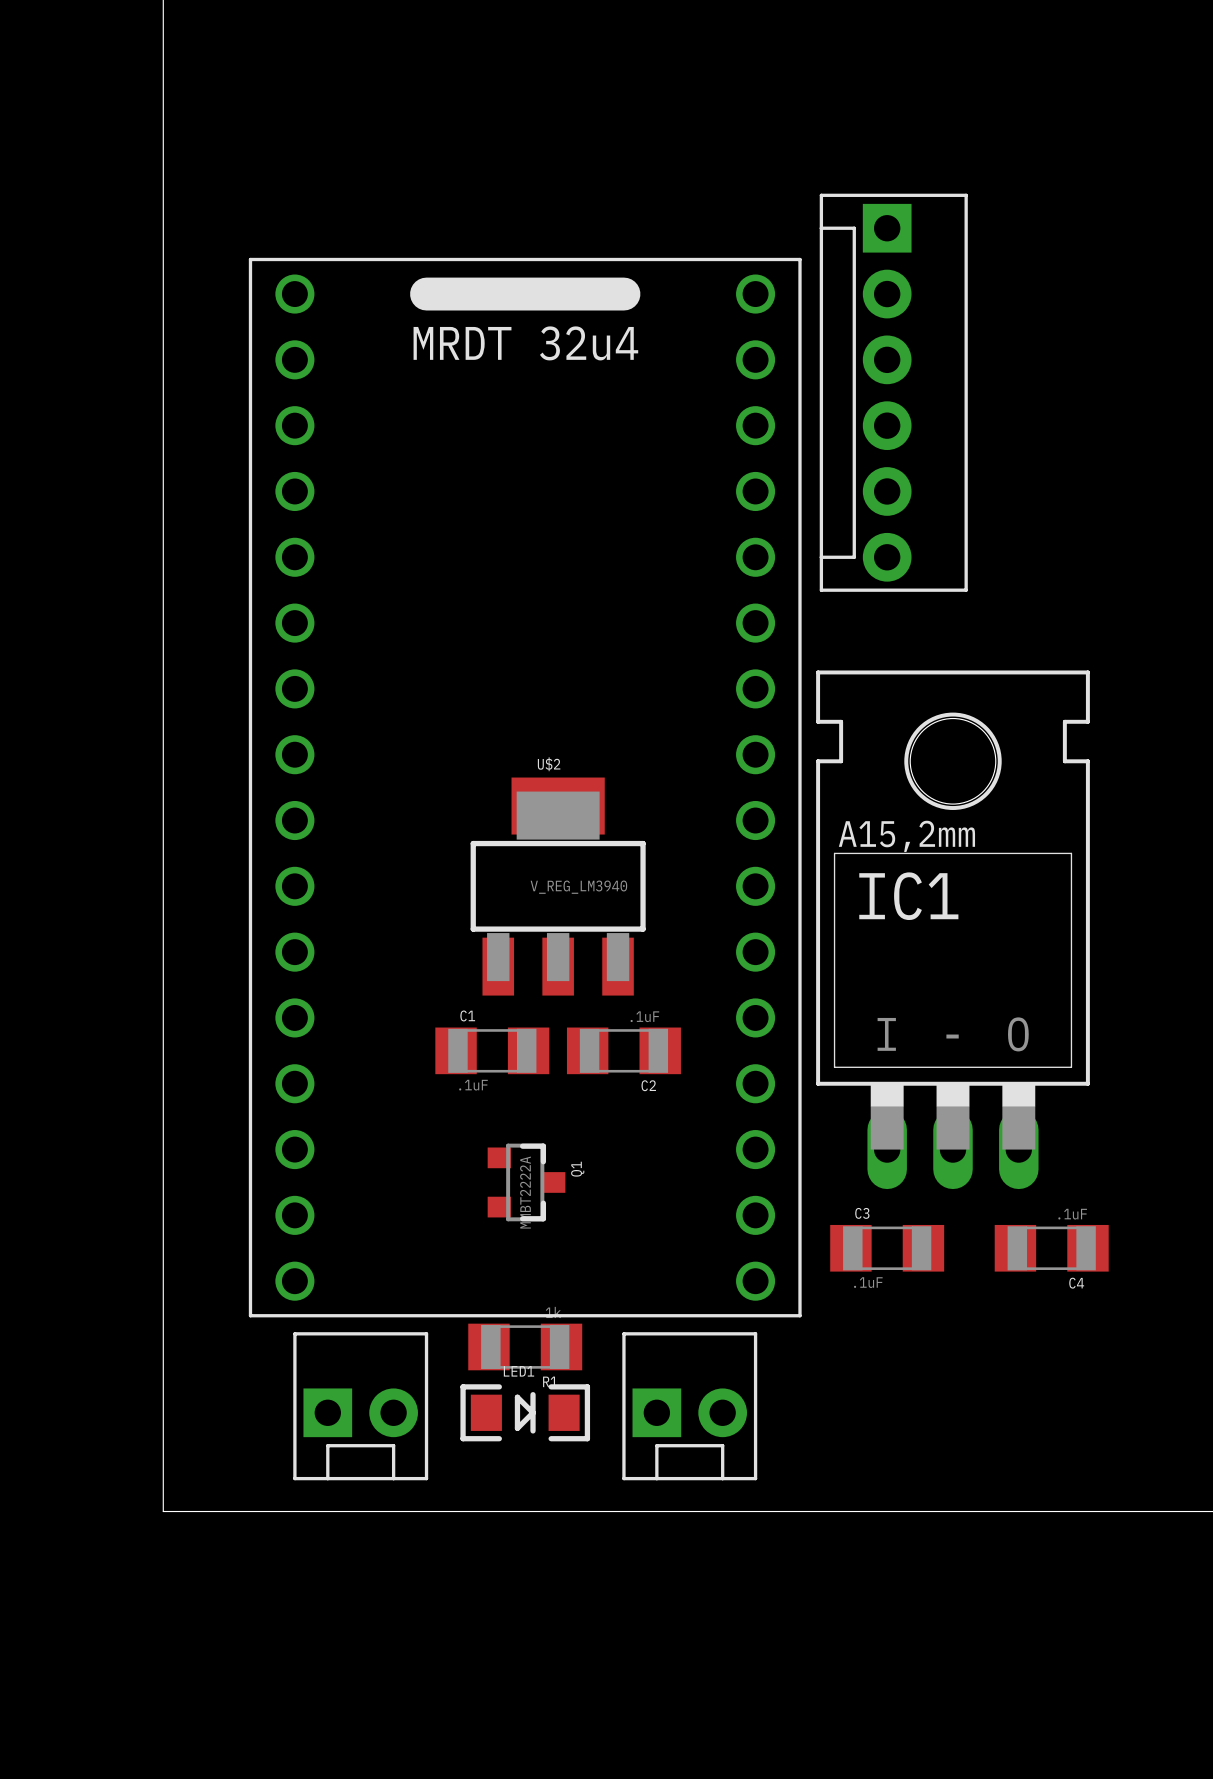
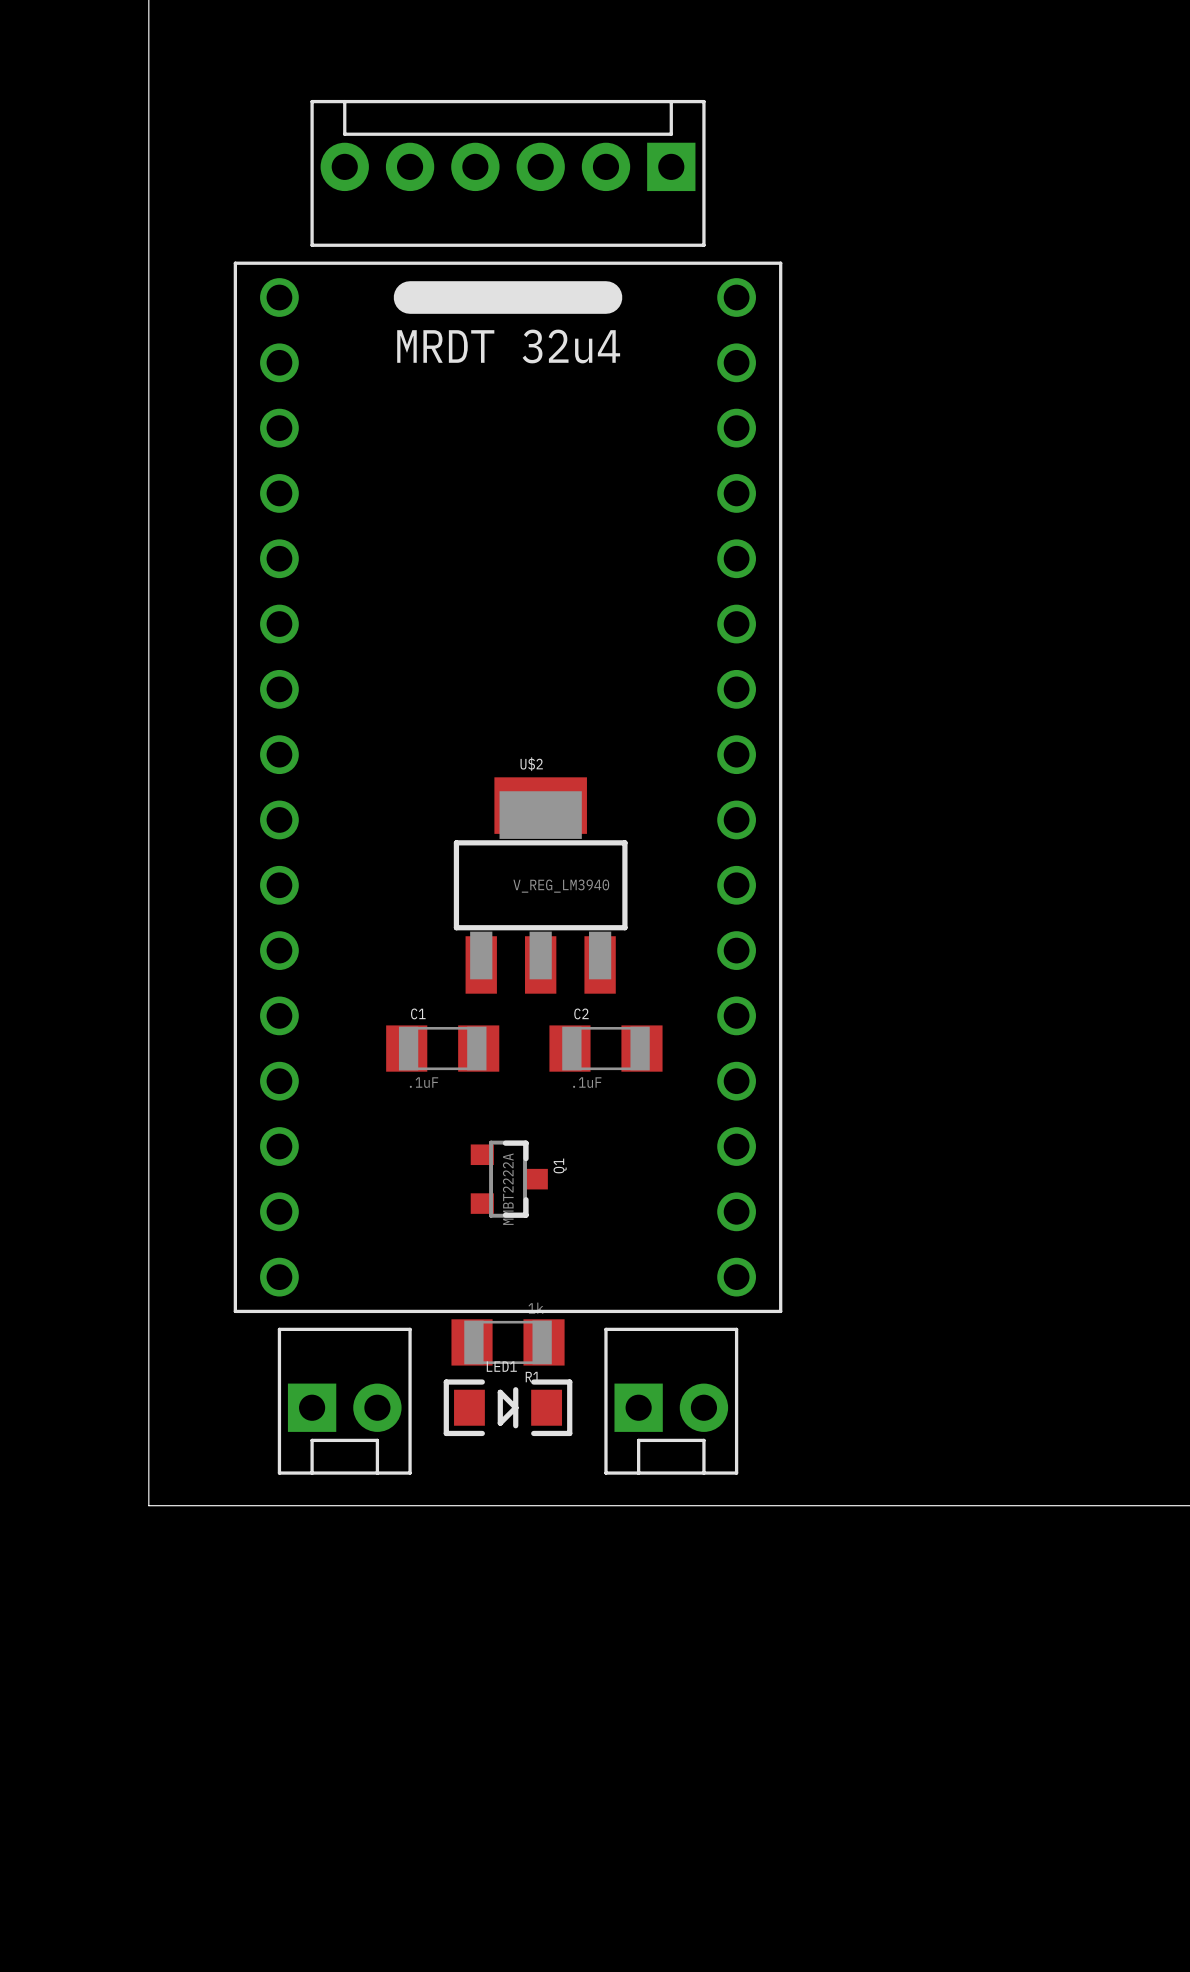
part rotation: 0° (893, 392) -> 90° clockwise (508, 173)
part position: (893, 392) -> (508, 173)
IC1: (953, 929) -> none
C2 value position: .1uF (644, 1016) -> .1uF (587, 1082)
C1 position: (492, 1050) -> (442, 1048)
C2 name position: C2 (648, 1085) -> C2 (581, 1013)
C3: .1uF (887, 1248) -> none
C4: .1uF (1051, 1248) -> none

